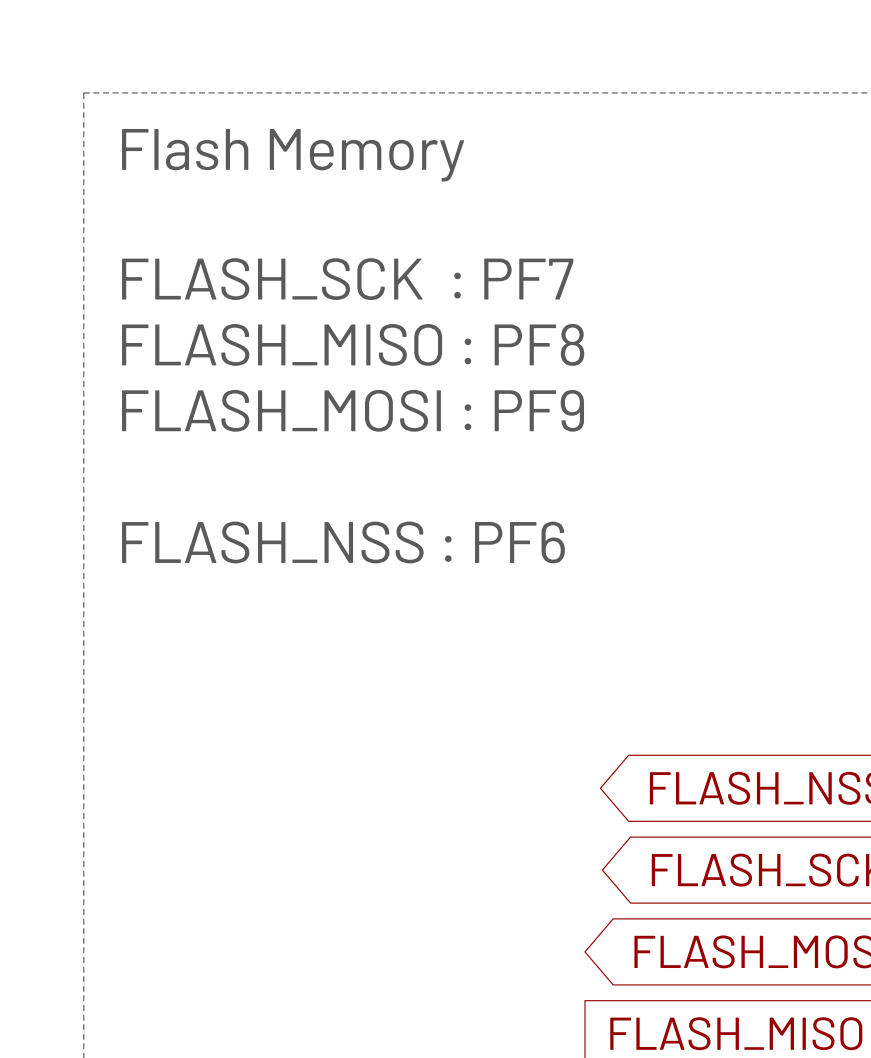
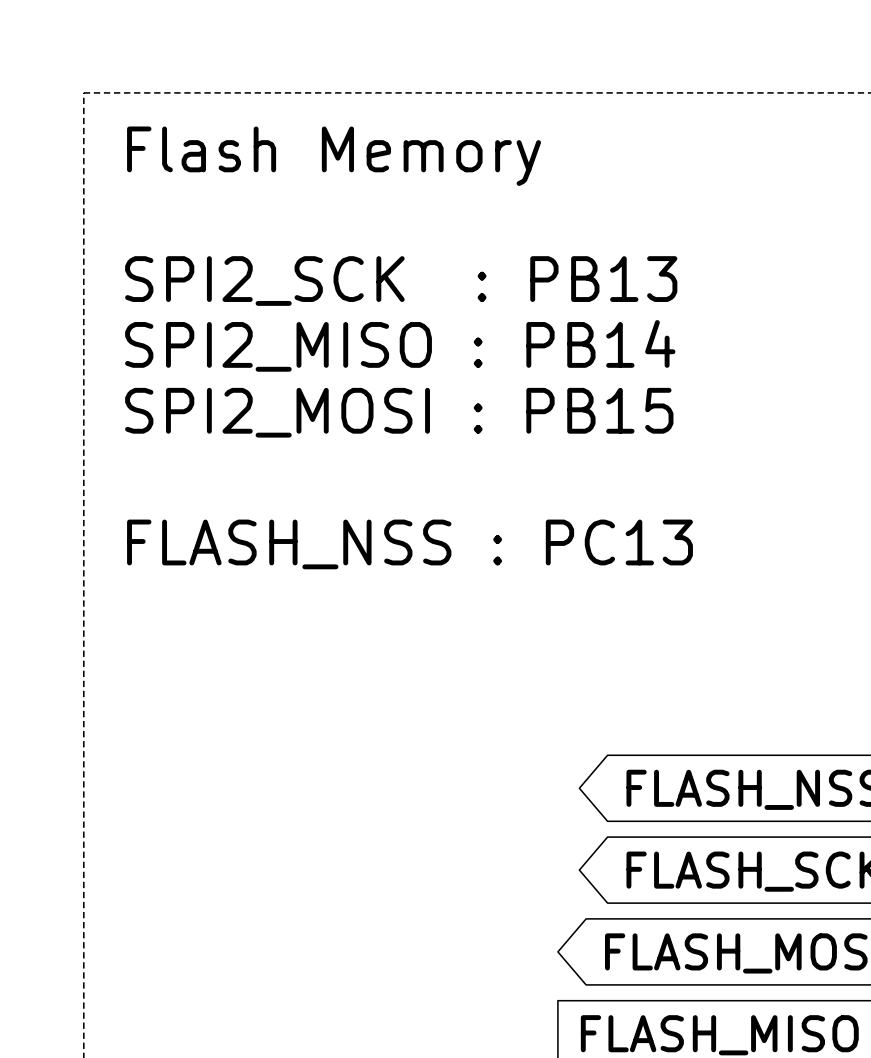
text: FLASH_SCK : PF7 (347, 279) -> SPI2_SCK : PB13 (401, 281)
text: FLASH_MISO : PF8 (353, 344) -> SPI2_MISO : PB14 (400, 345)
text: FLASH_MOSI : PF9 (353, 410) -> SPI2_MOSI : PB15 (399, 412)
text: FLASH_NSS : PF6 (343, 542) -> FLASH_NSS : PC13 (409, 544)

